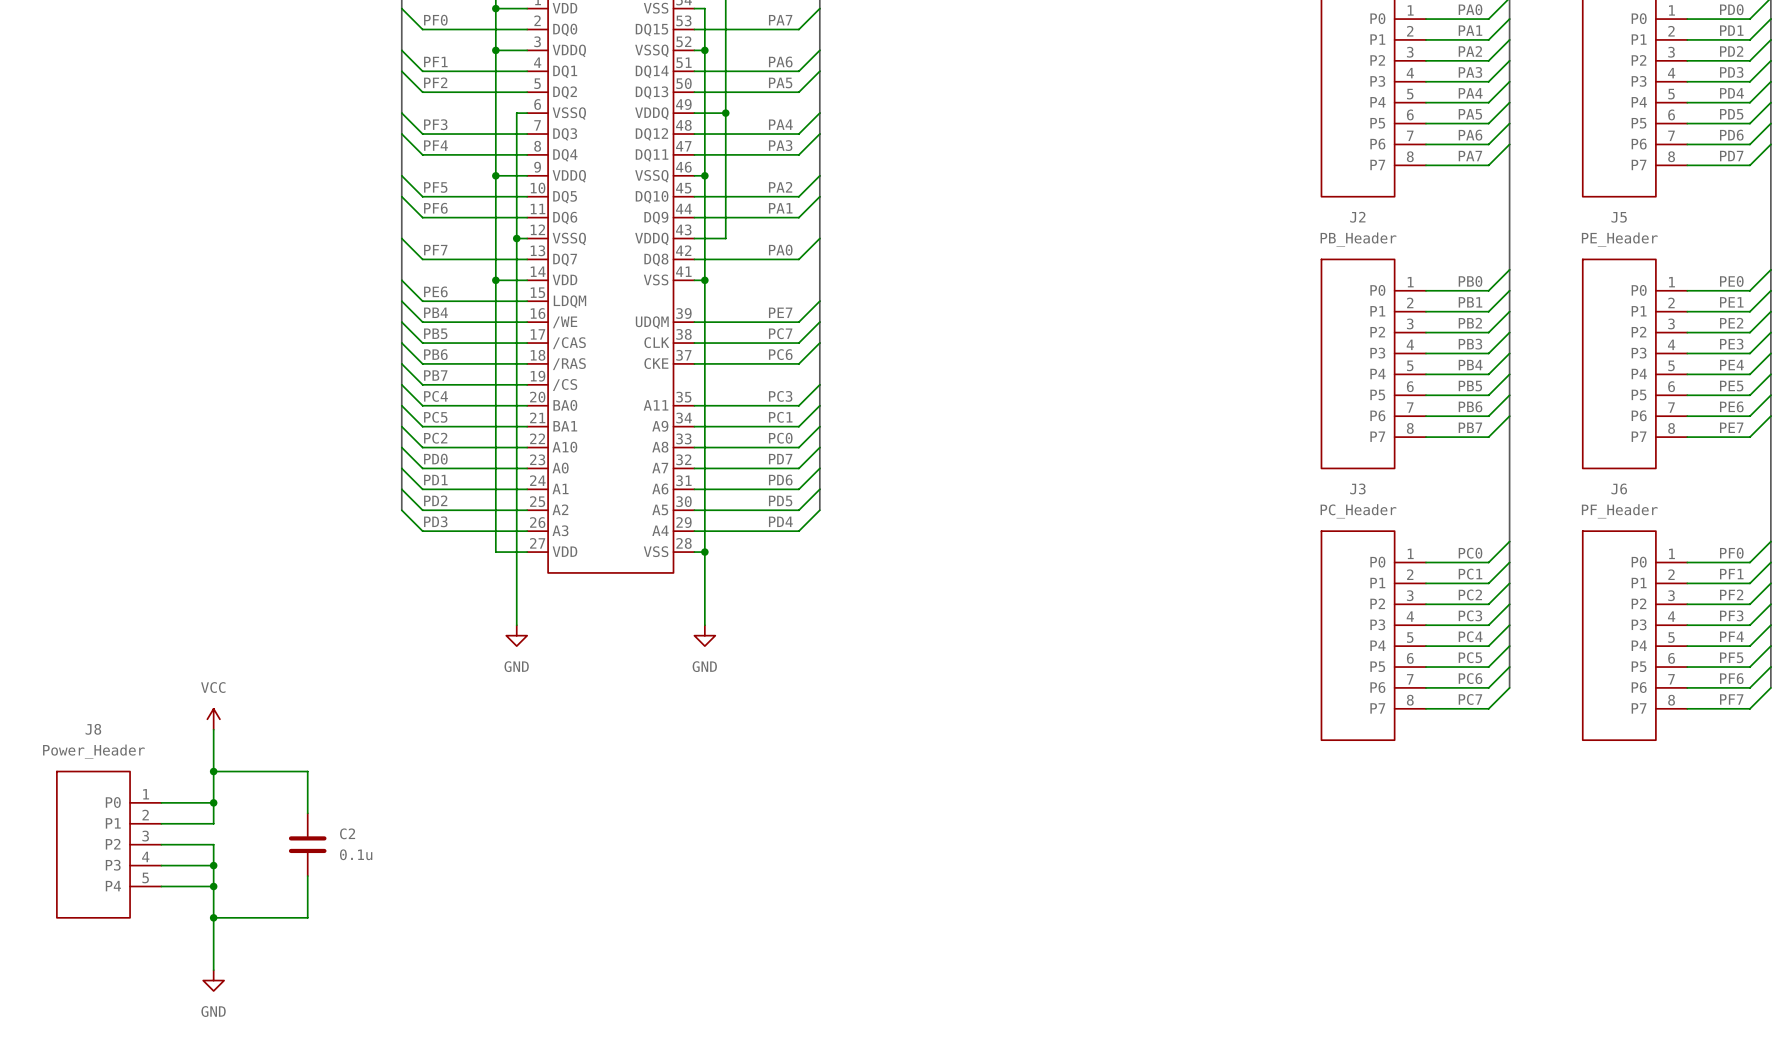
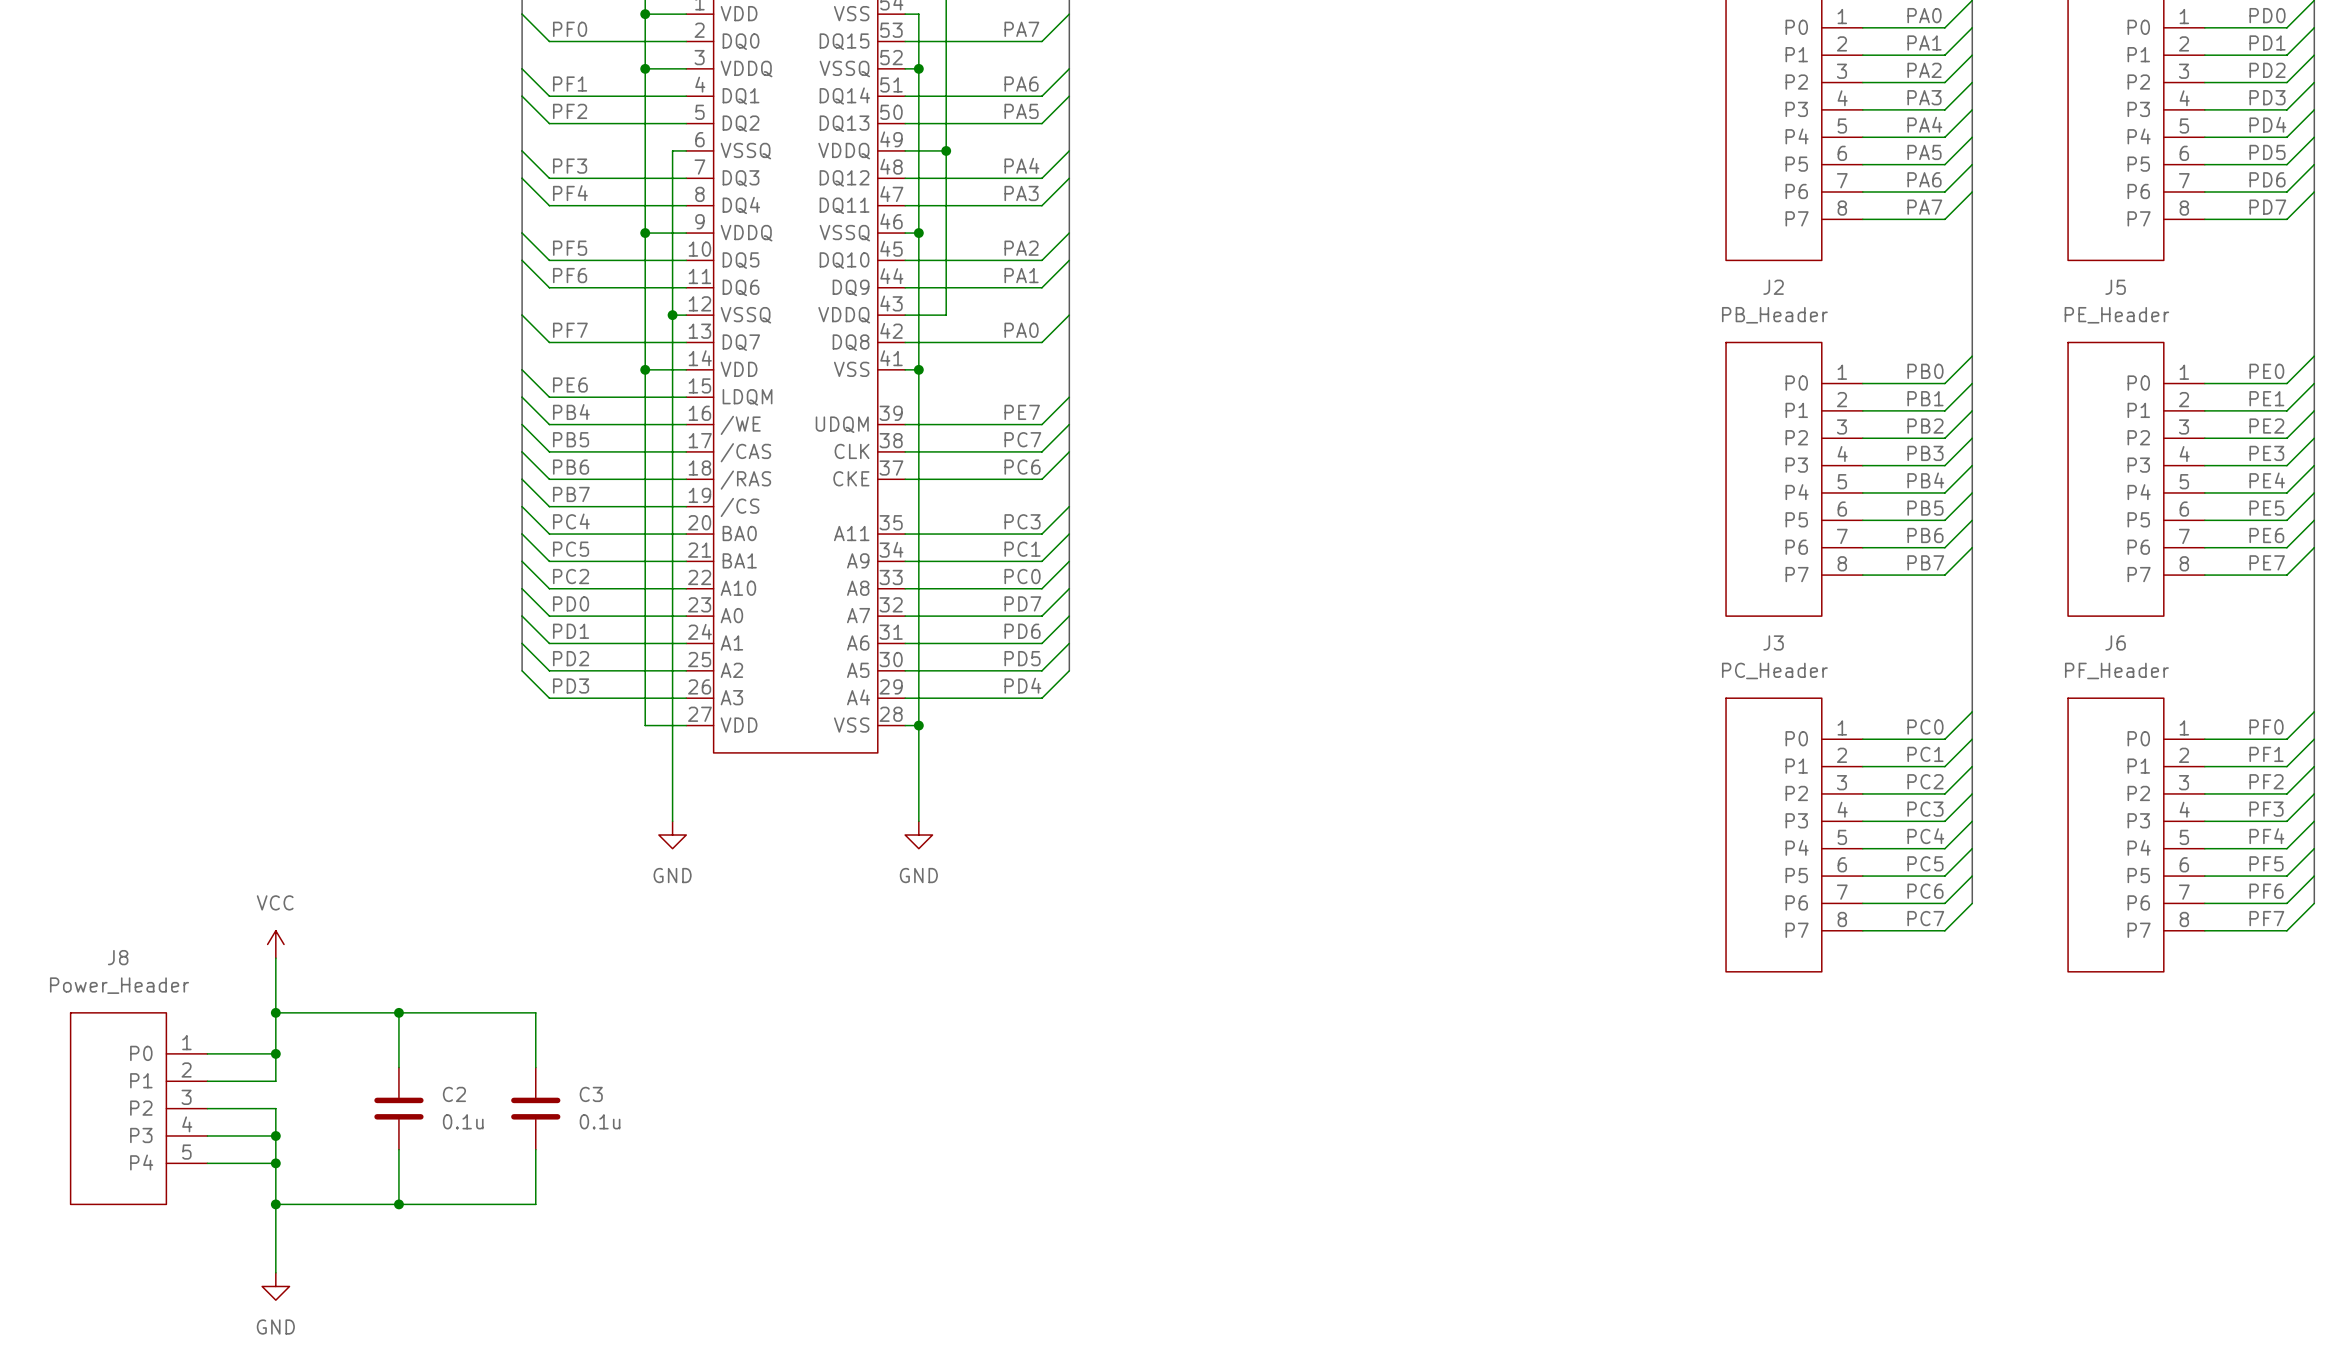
wire: none -> (398, 1012) (535, 1012) (535, 1067)
junction: none -> (398, 1012)
C3: none -> 0.1u (535, 1108)
wire: none -> (535, 1149) (535, 1204) (398, 1204)
junction: none -> (398, 1204)

